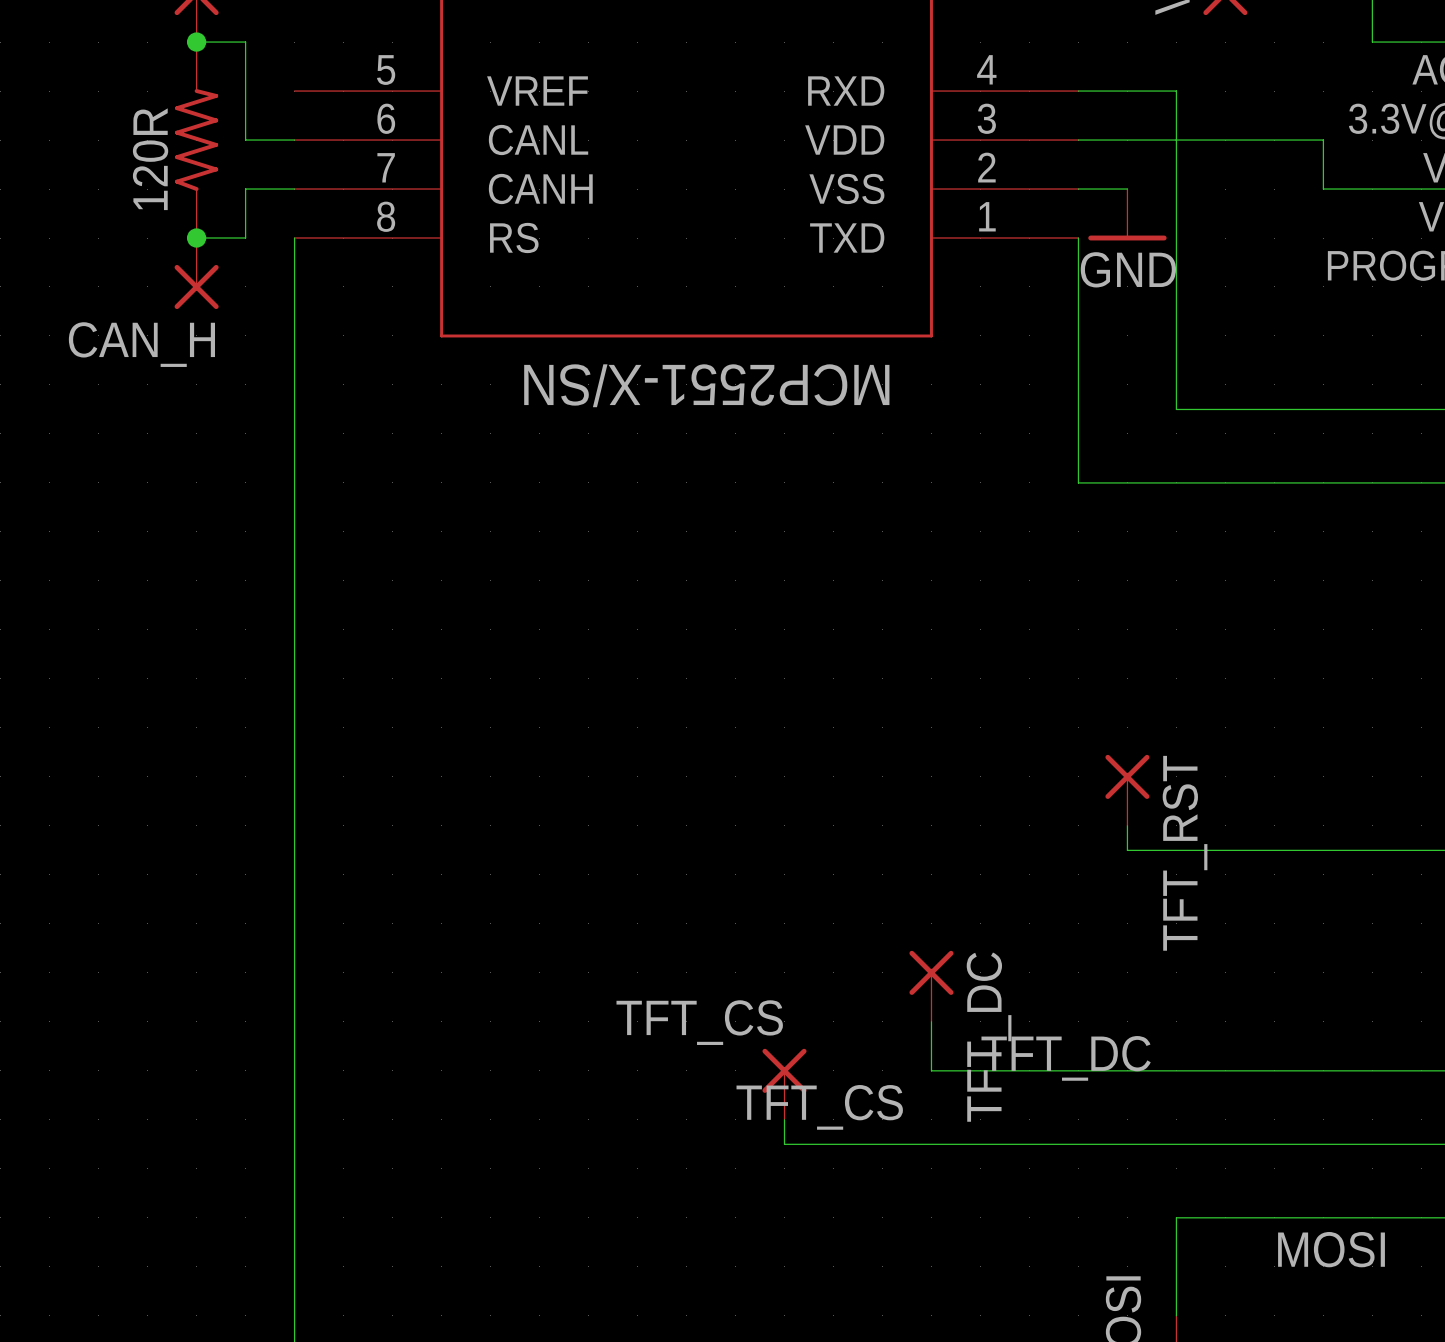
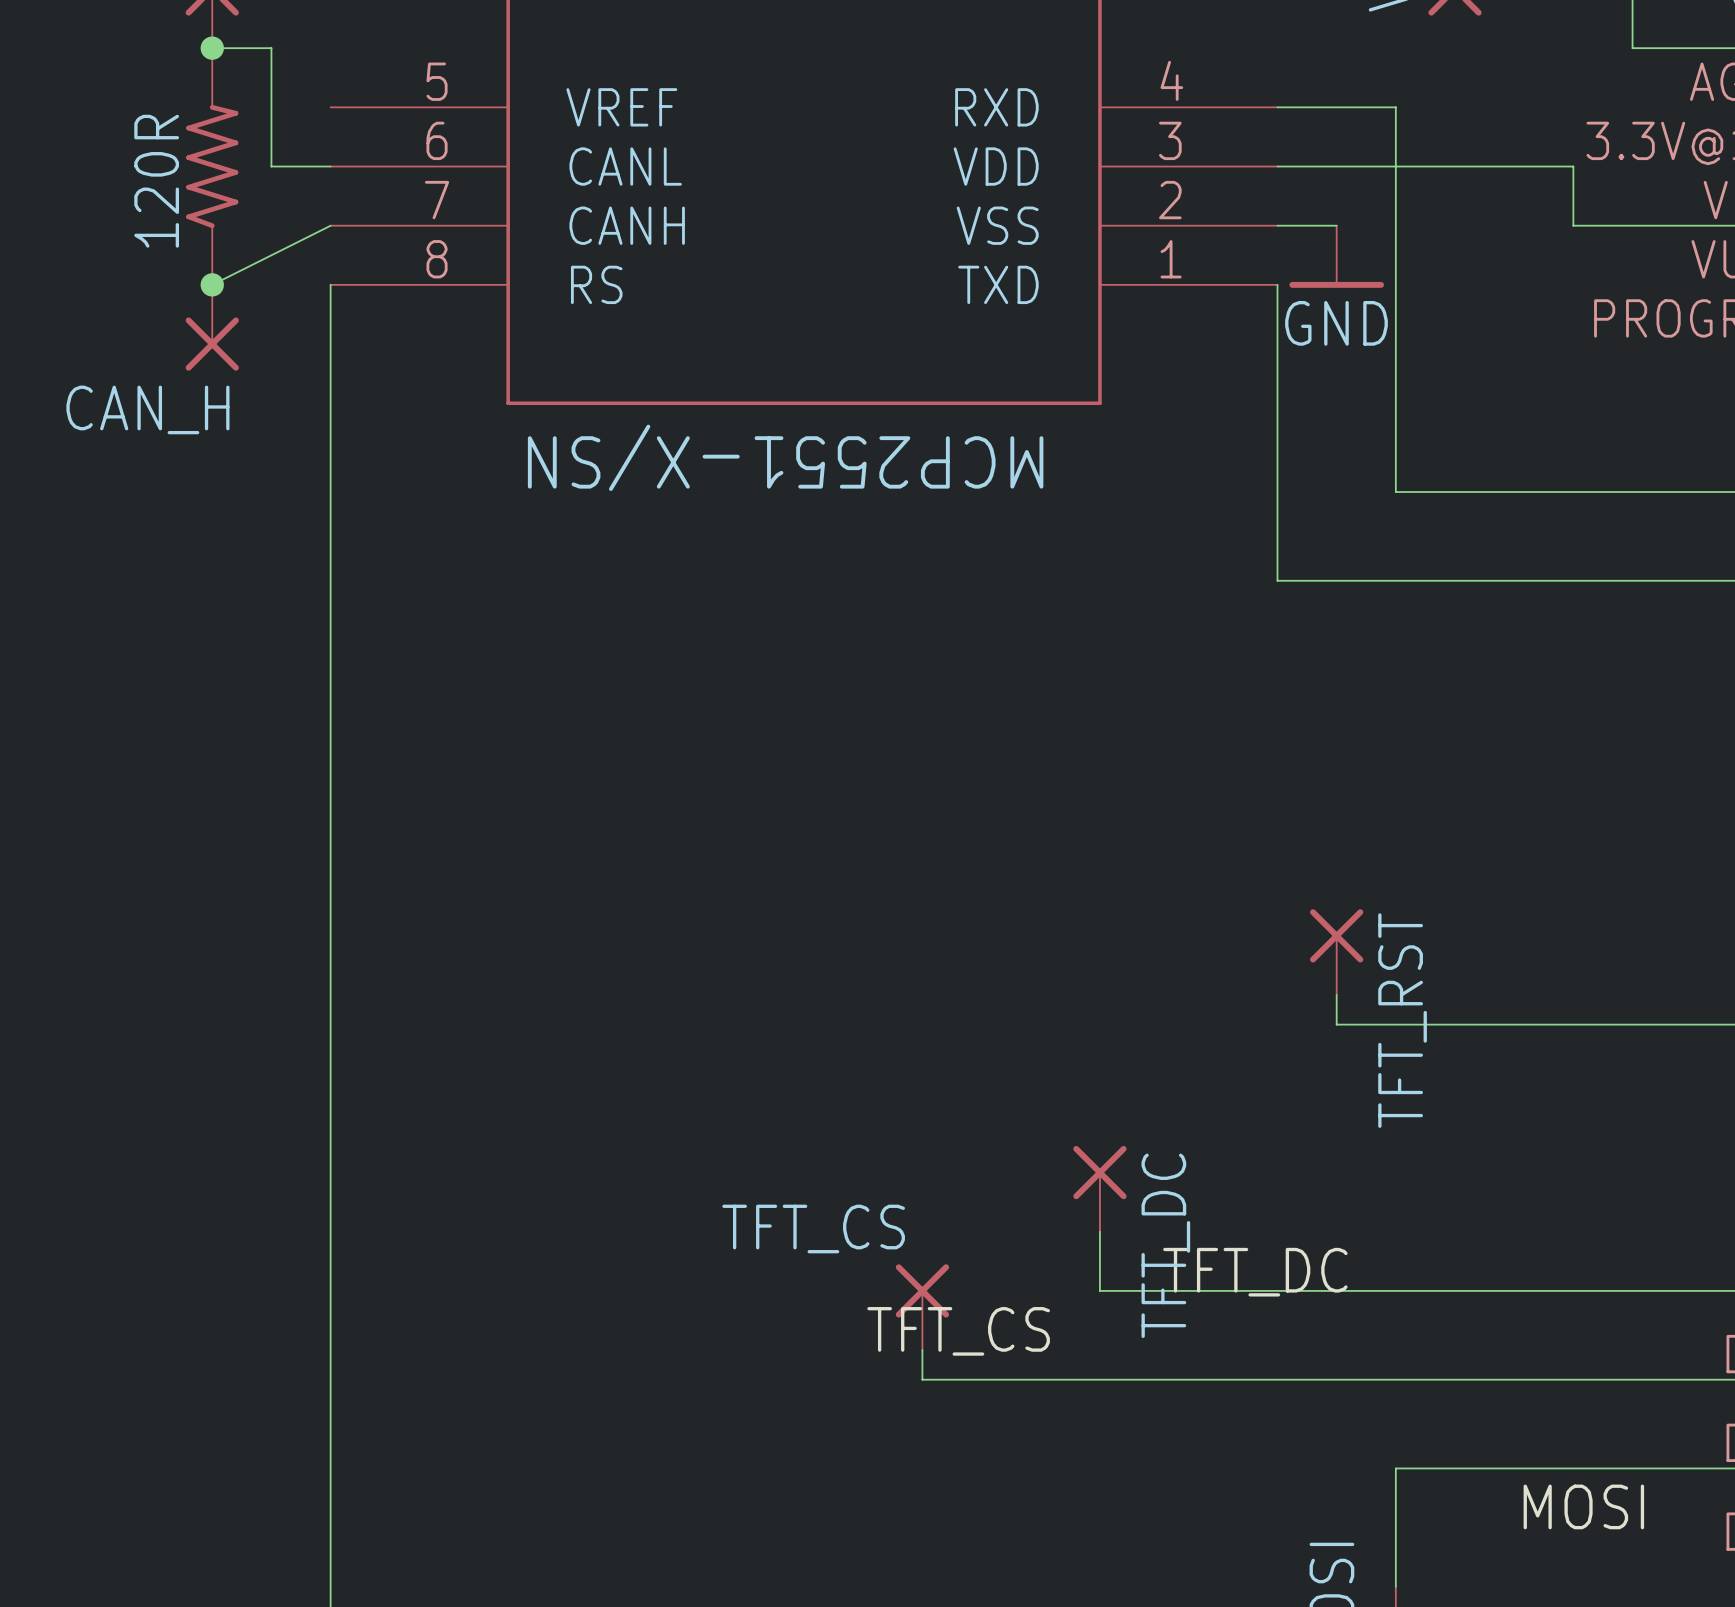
wire: (294, 189) (245, 189) (245, 238) (196, 238) -> (330, 225) (212, 284)

